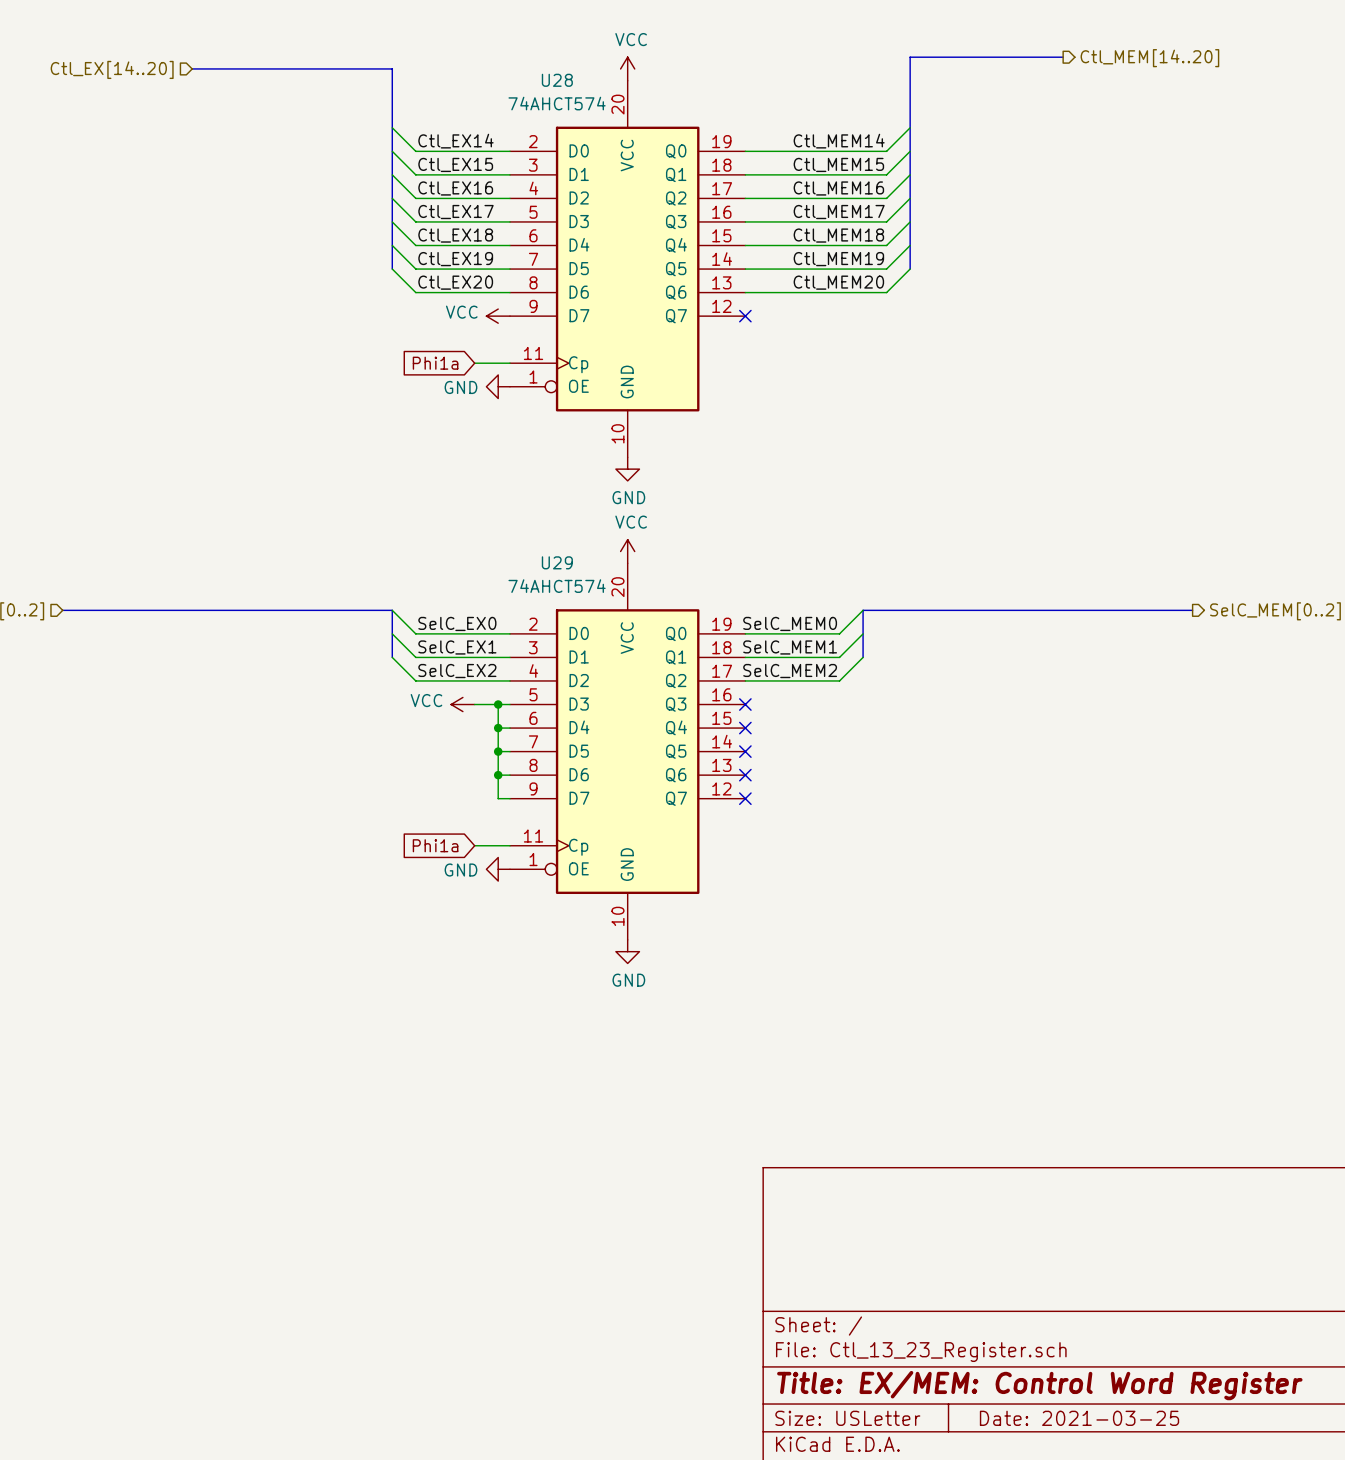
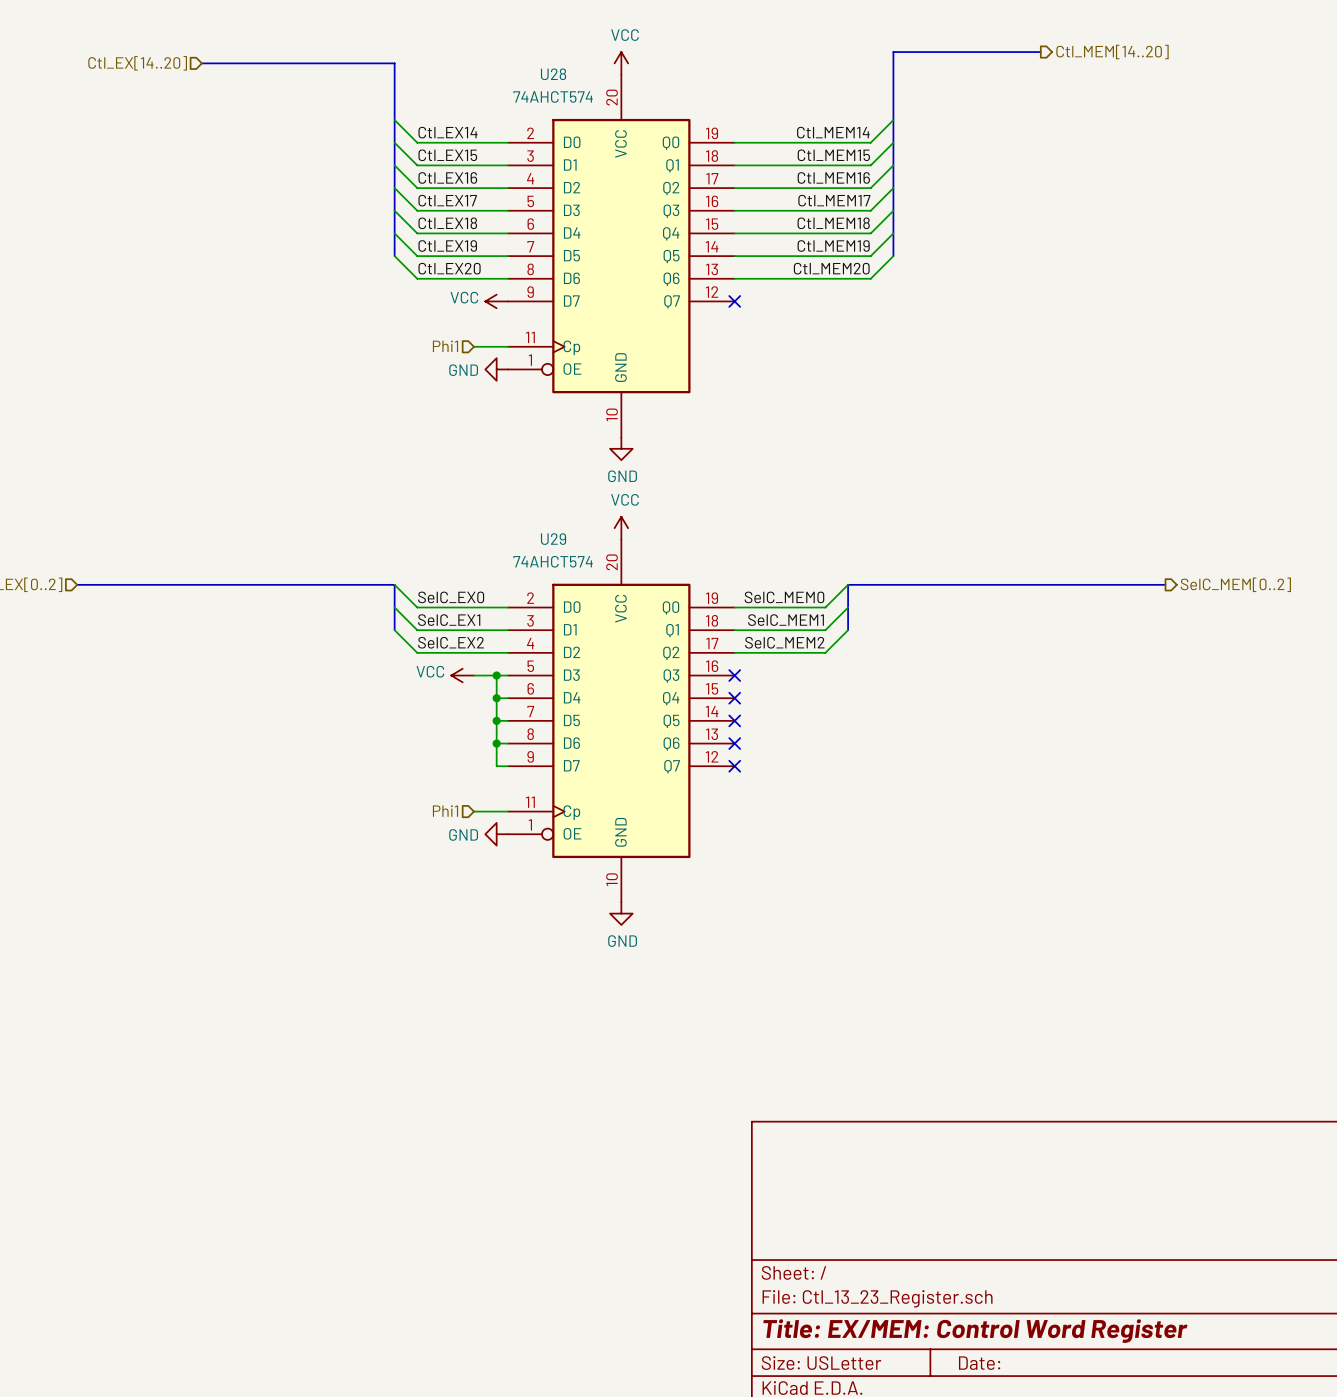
hierarchical label: none -> Phi1 (445, 346)
global label: Phi1a (435, 363) -> none
global label: Phi1a (435, 845) -> none
hierarchical label: none -> Phi1 (445, 811)
title block: Date: 2021-03-25 (1079, 1418) -> Date: (979, 1363)

